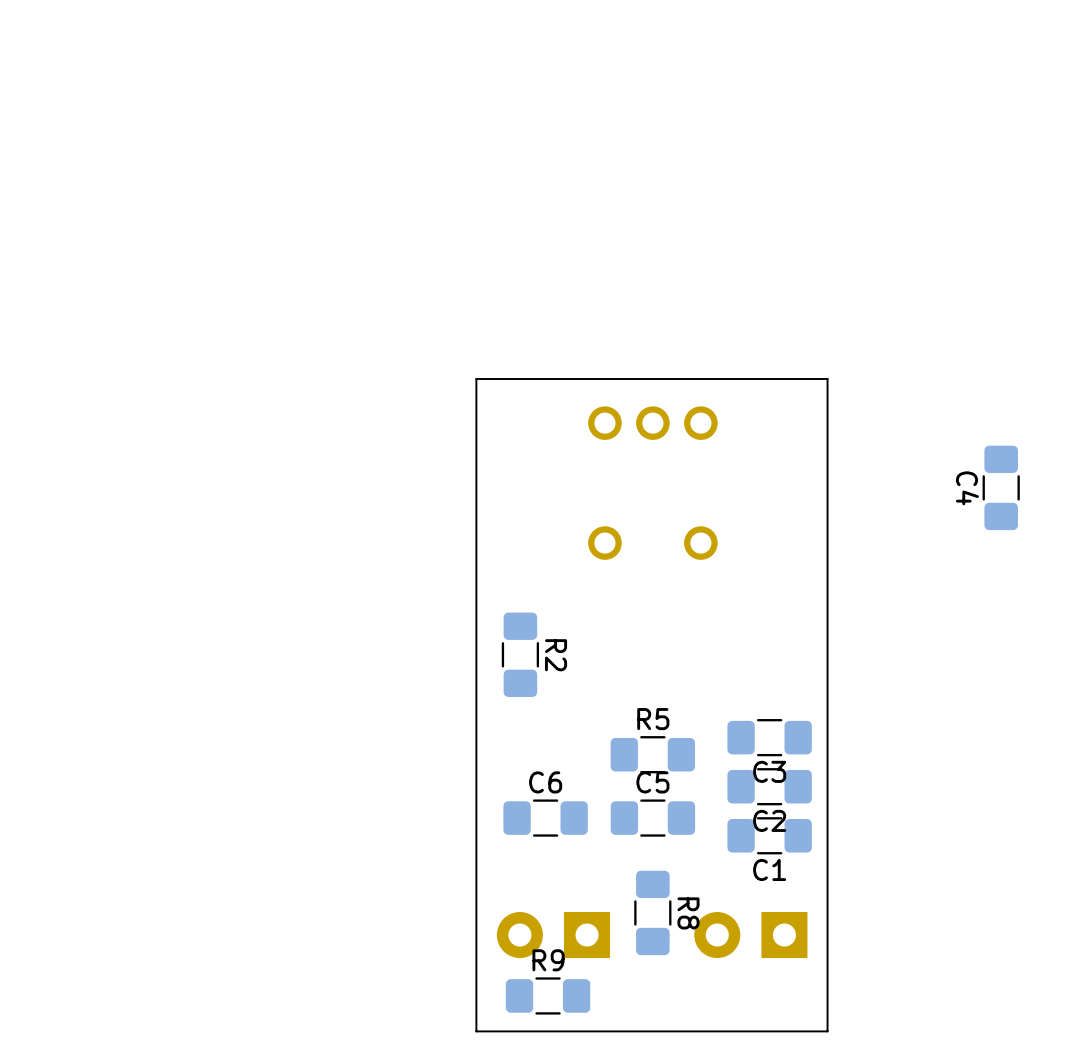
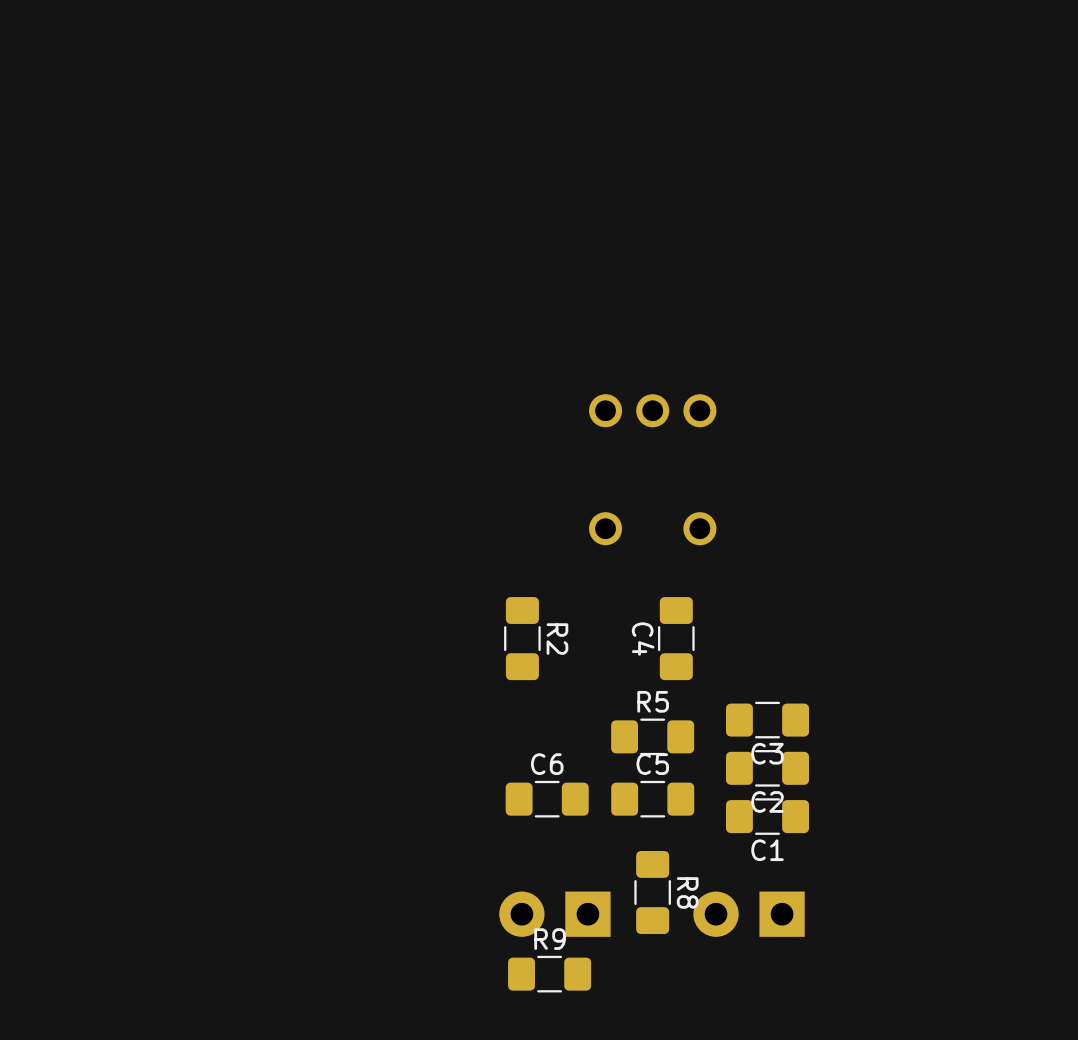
board edge: (827, 378) (827, 1031) (476, 1031) (476, 378) (827, 378) -> none
C4 position: (1001, 487) -> (676, 638)

